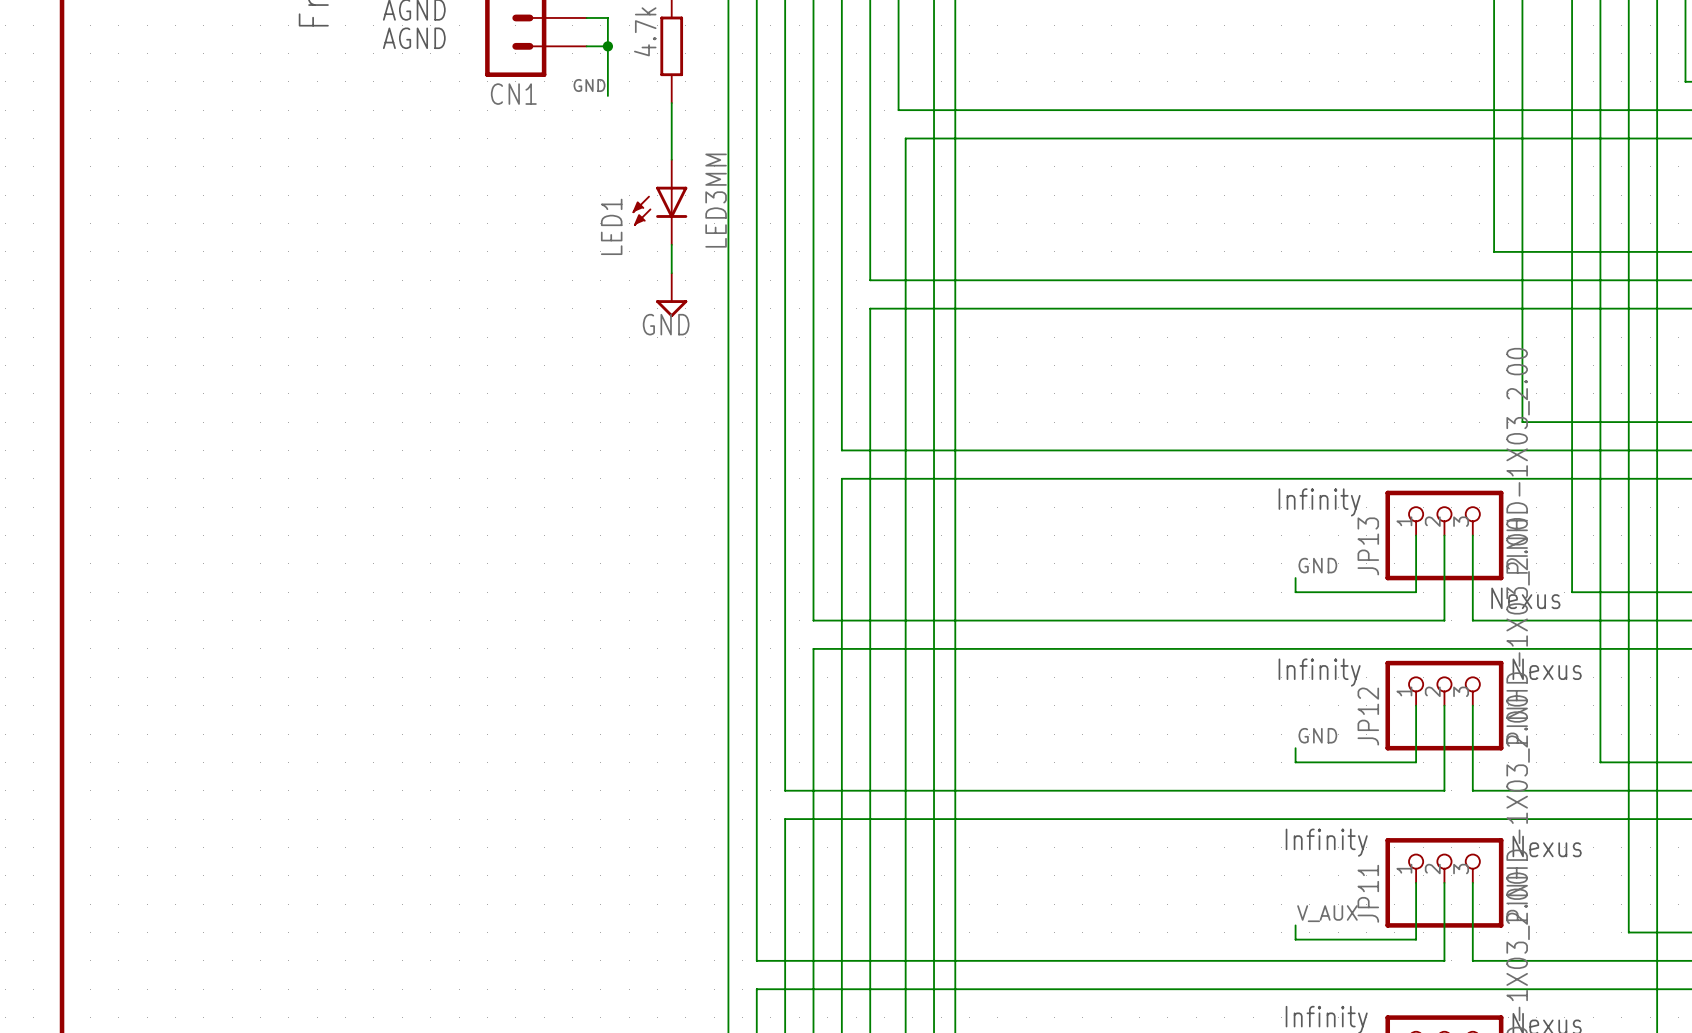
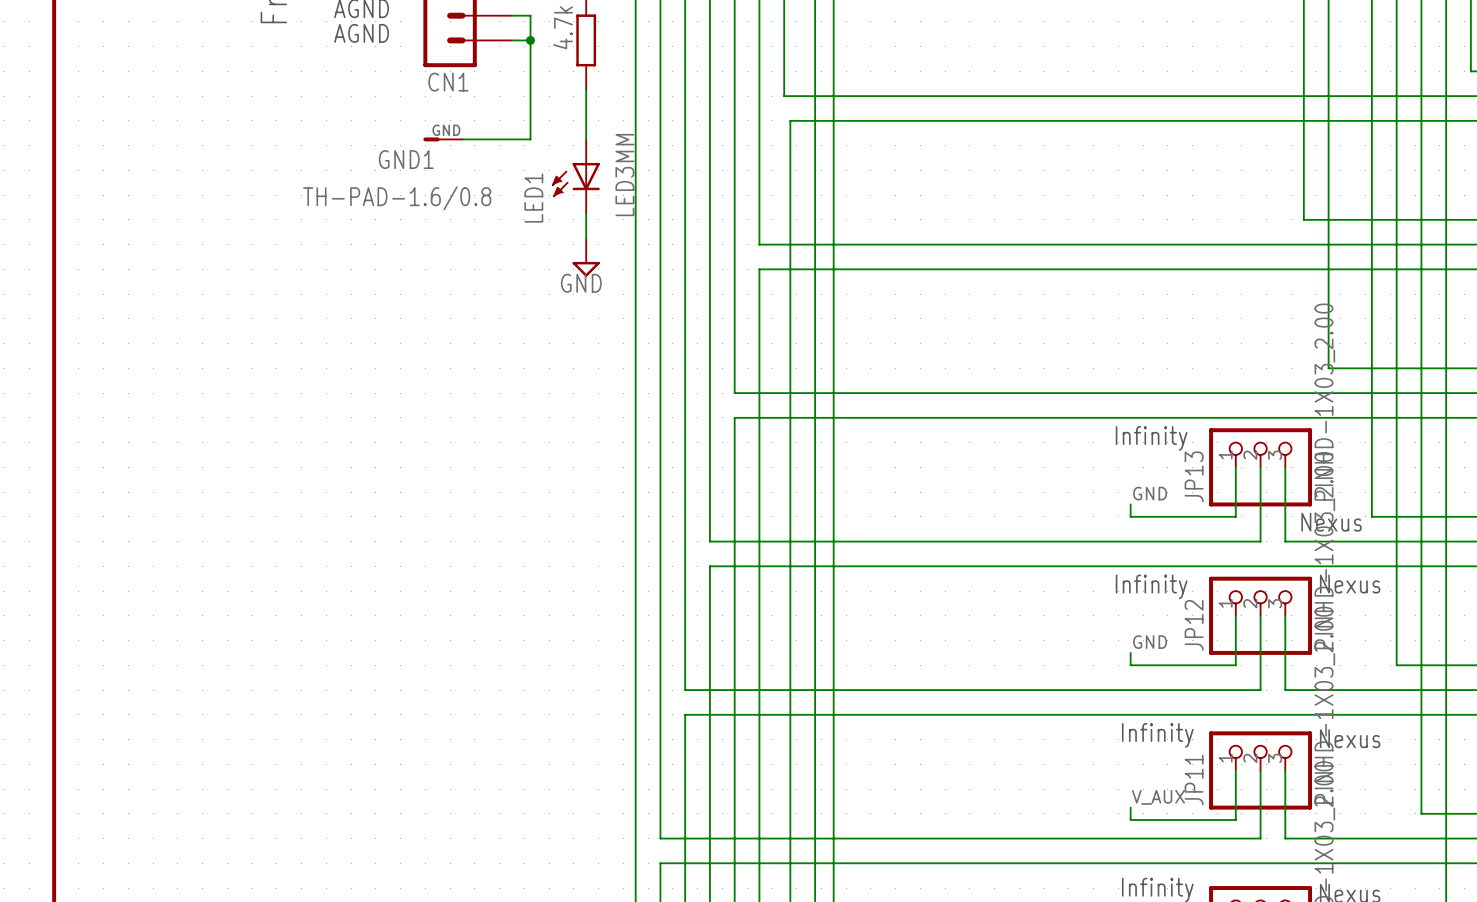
label position: GND (589, 85) -> GND (446, 130)
wire: none -> (530, 83) (530, 139) (462, 139)
GND1: none -> TH-PAD-1.6/0.8 (442, 139)

